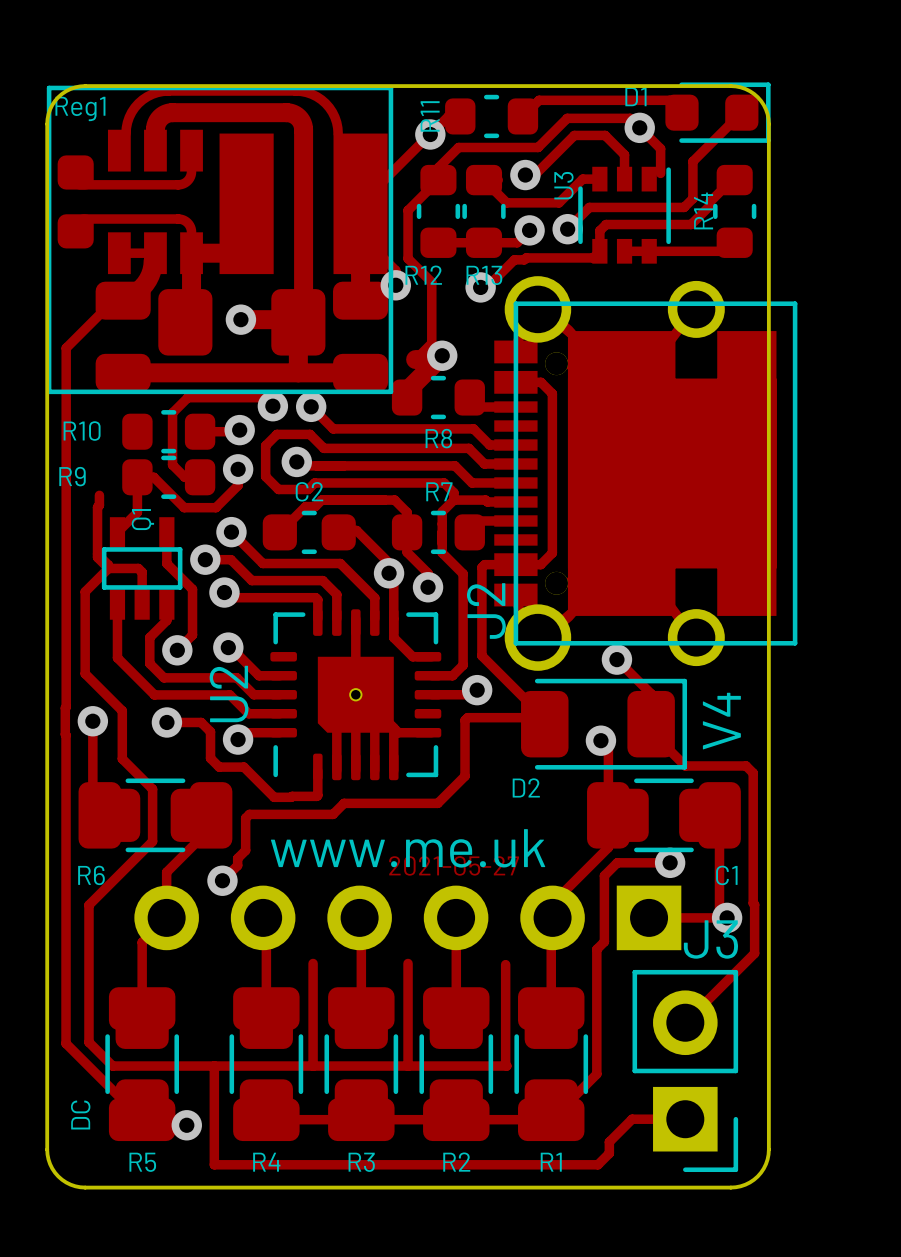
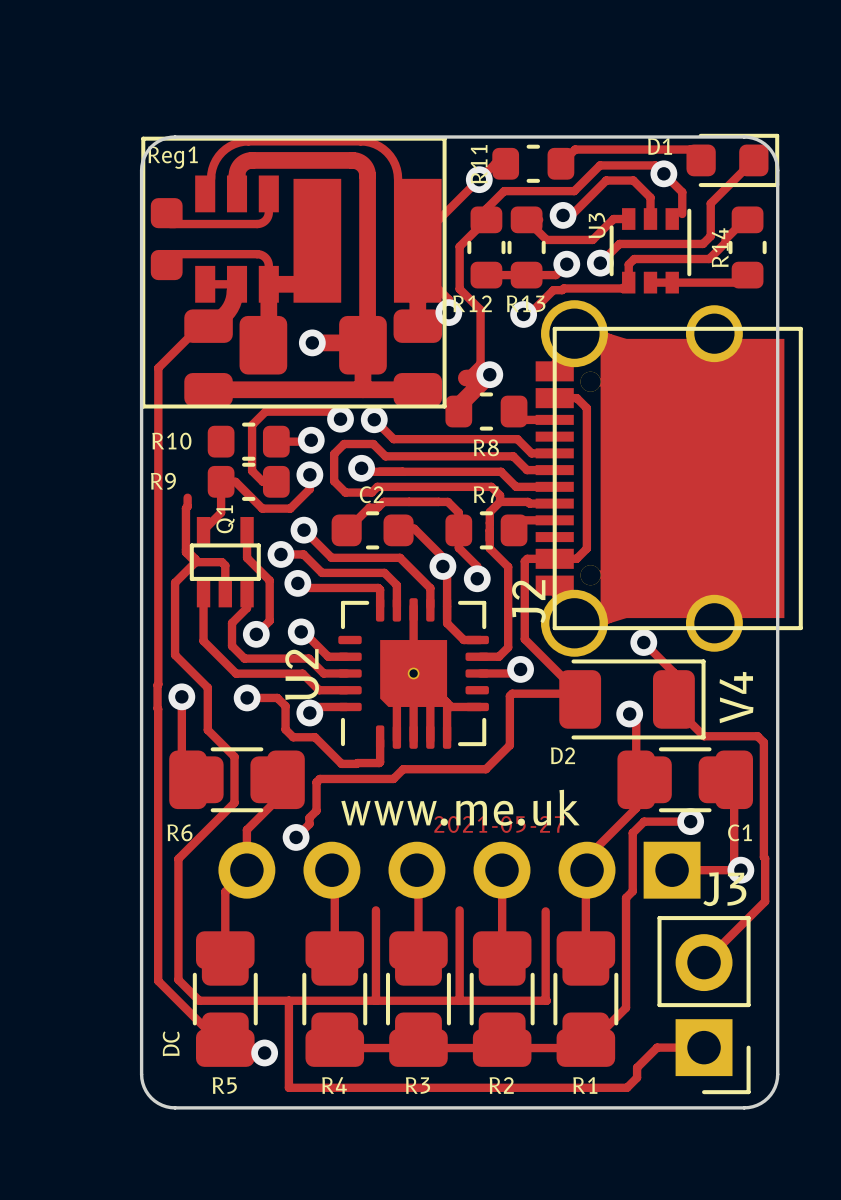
J2 footprint: [494, 276, 798, 671] -> [535, 300, 803, 657]

